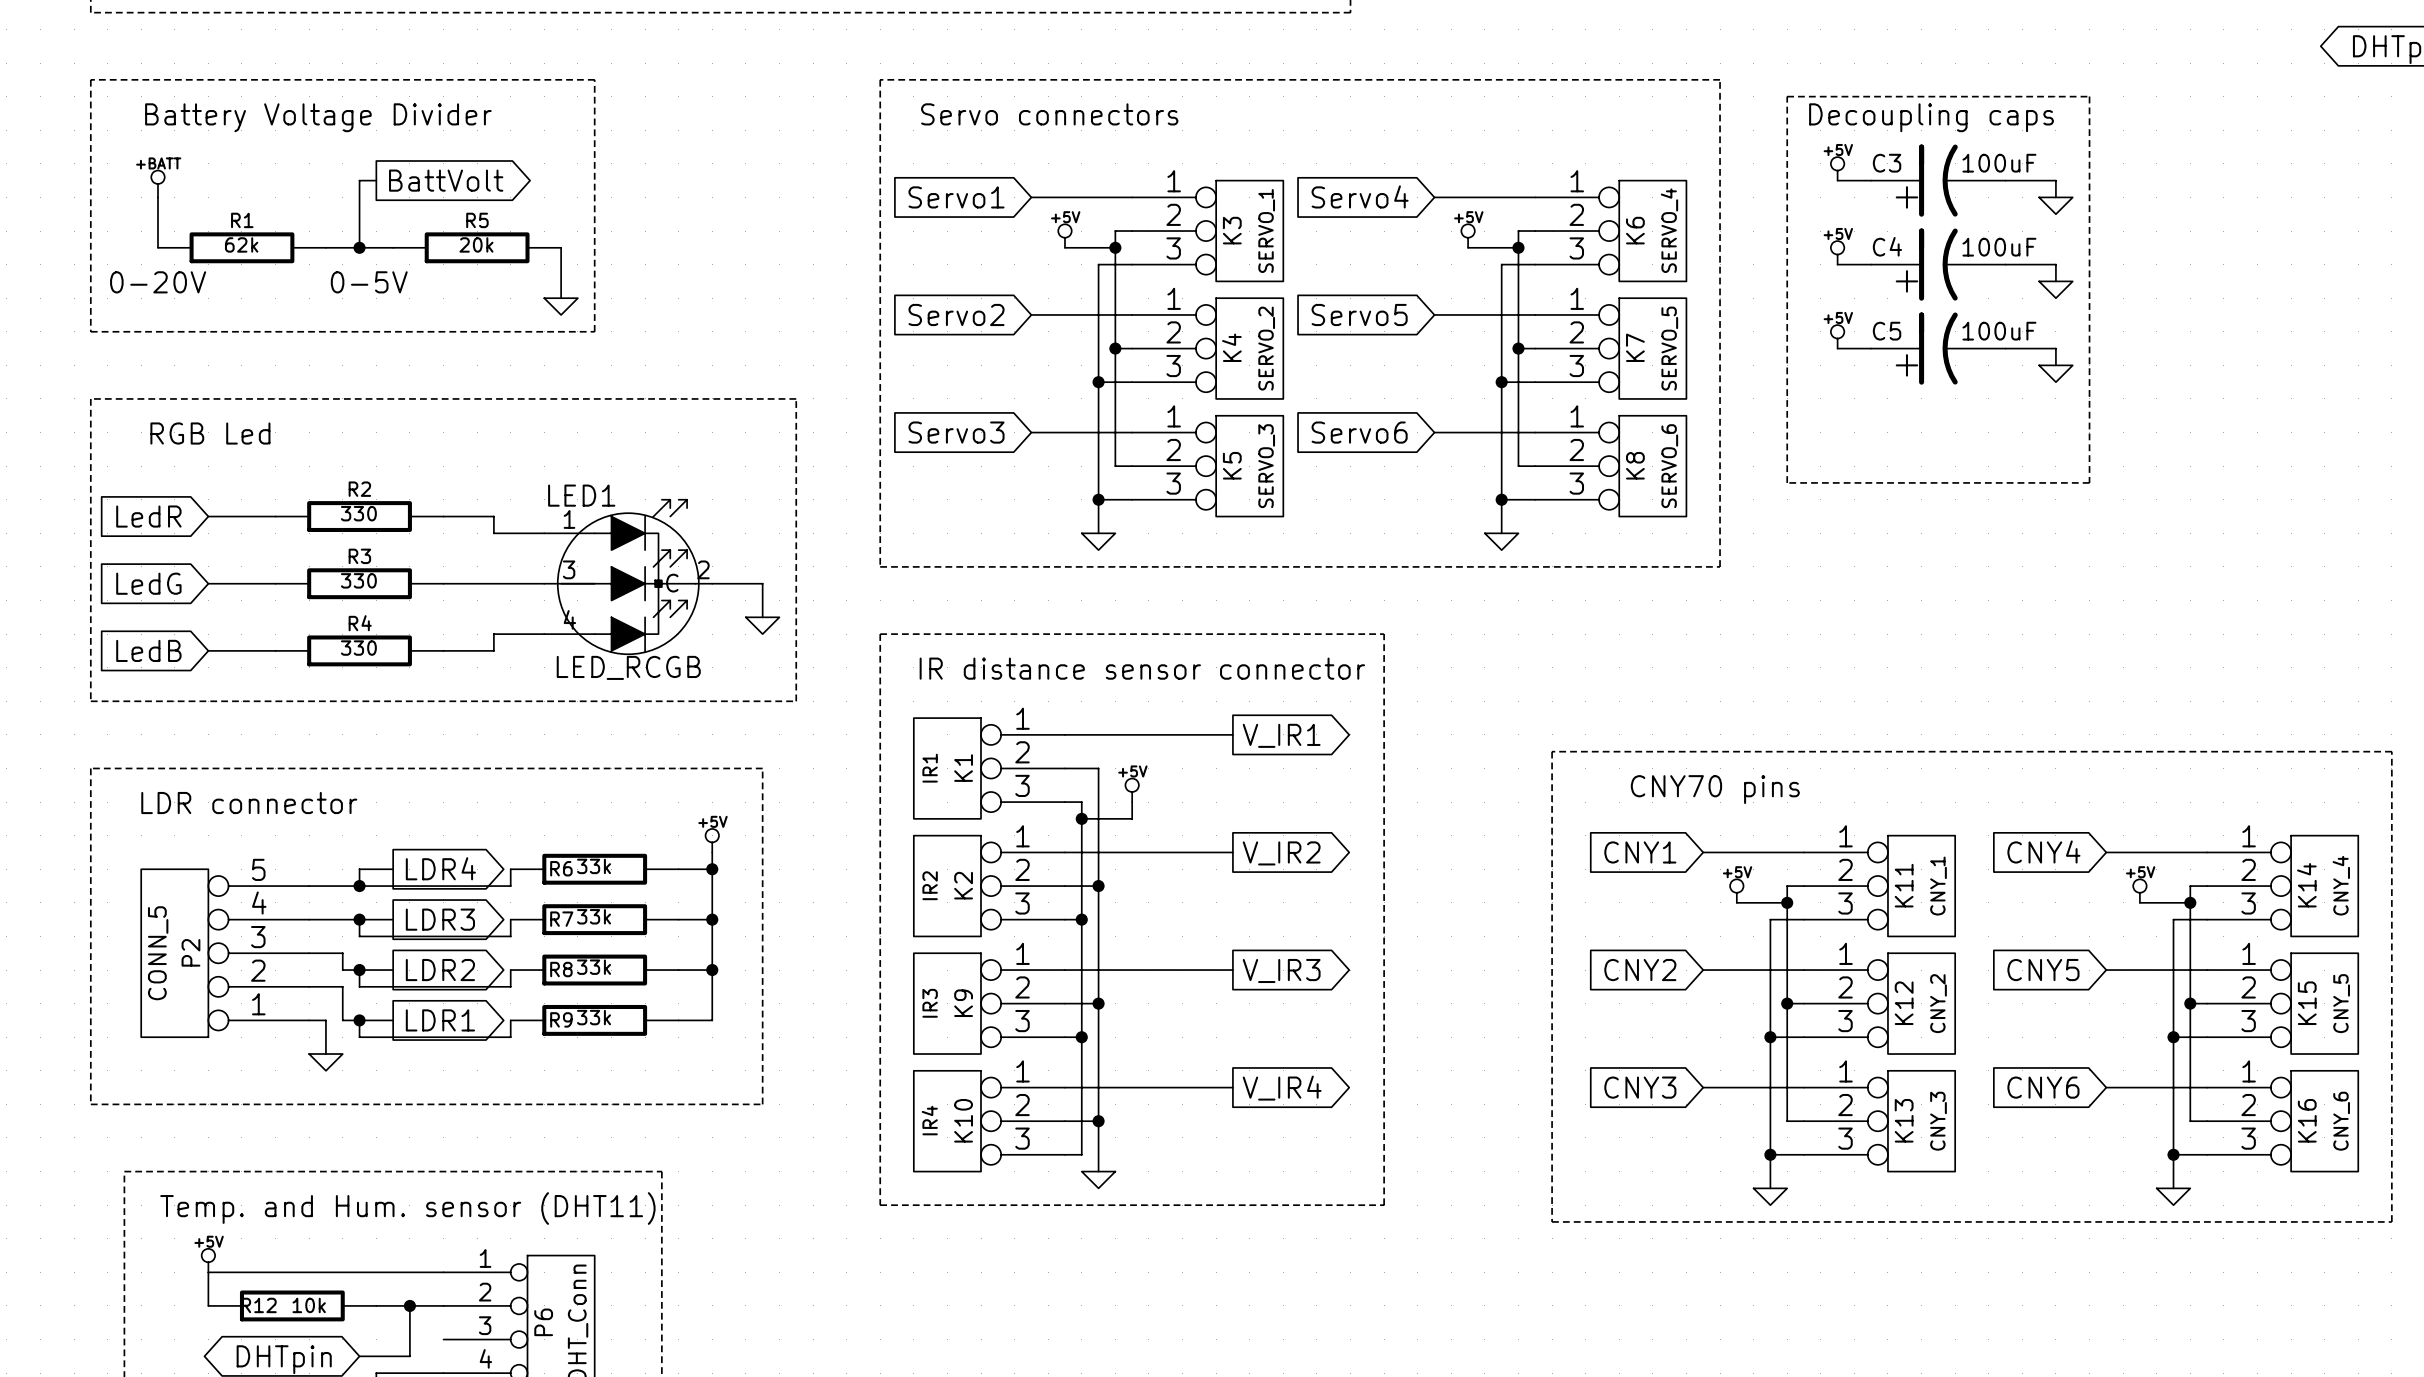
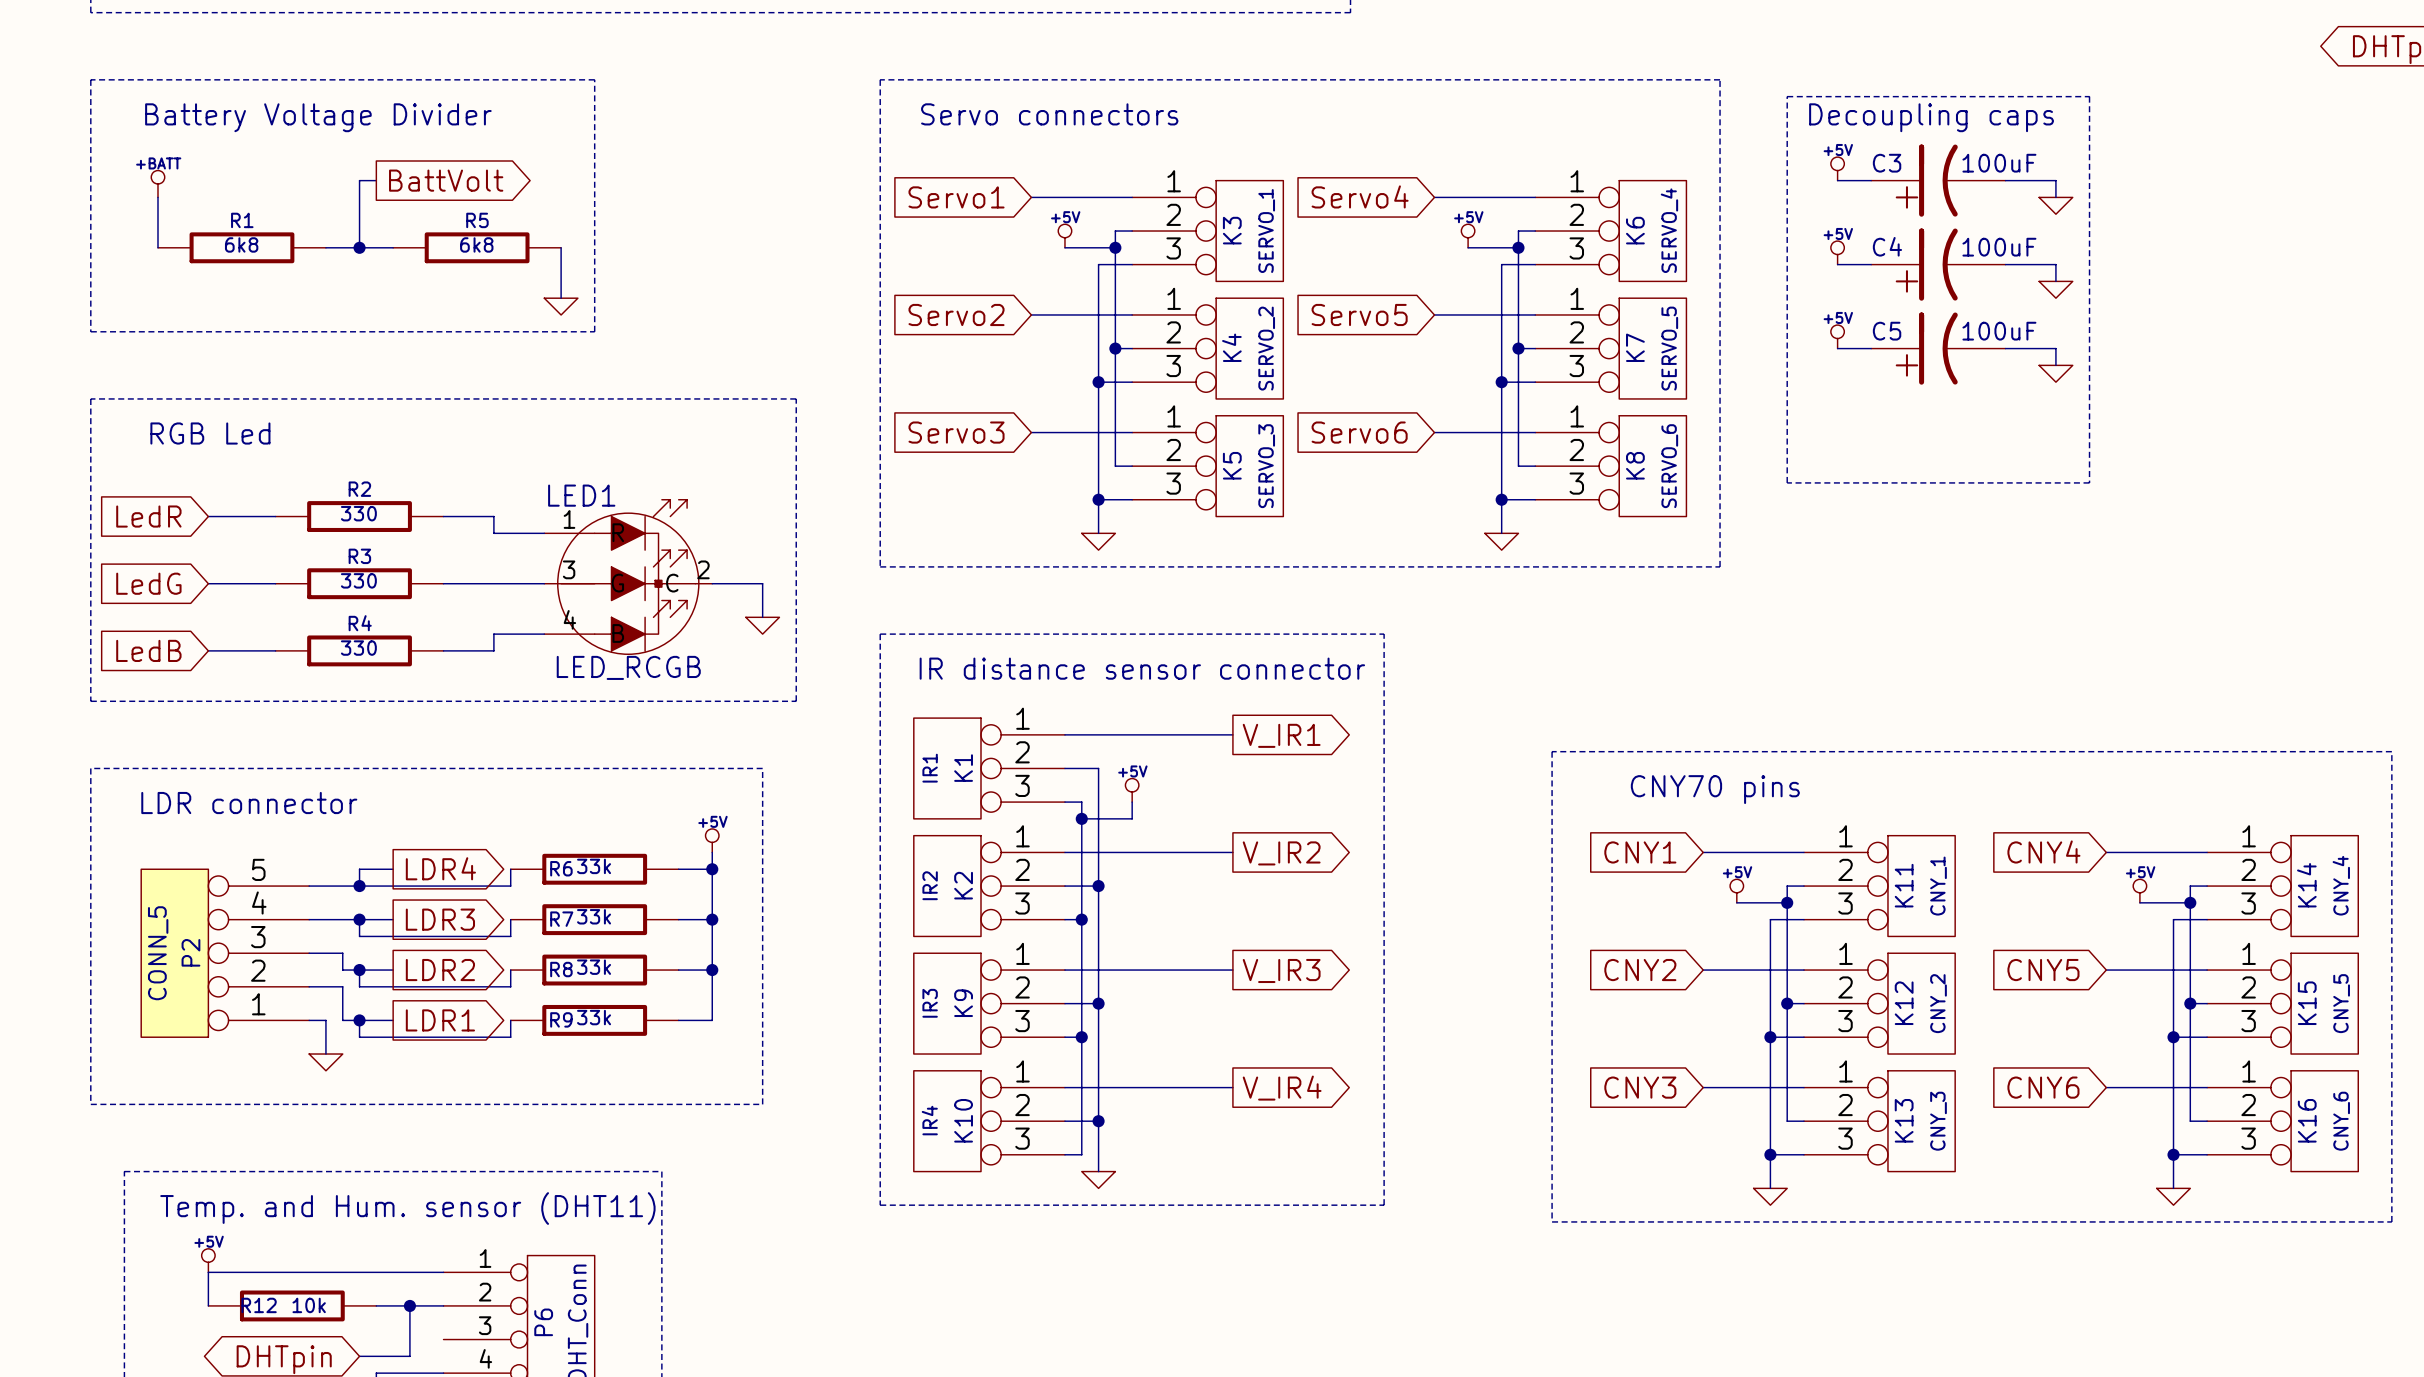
R1 value: 62k (241, 244) -> 6k8 (241, 244)
R5 value: 20k (476, 244) -> 6k8 (476, 244)
text: 0-20V (158, 282) -> none
text: 0-5V (369, 282) -> none

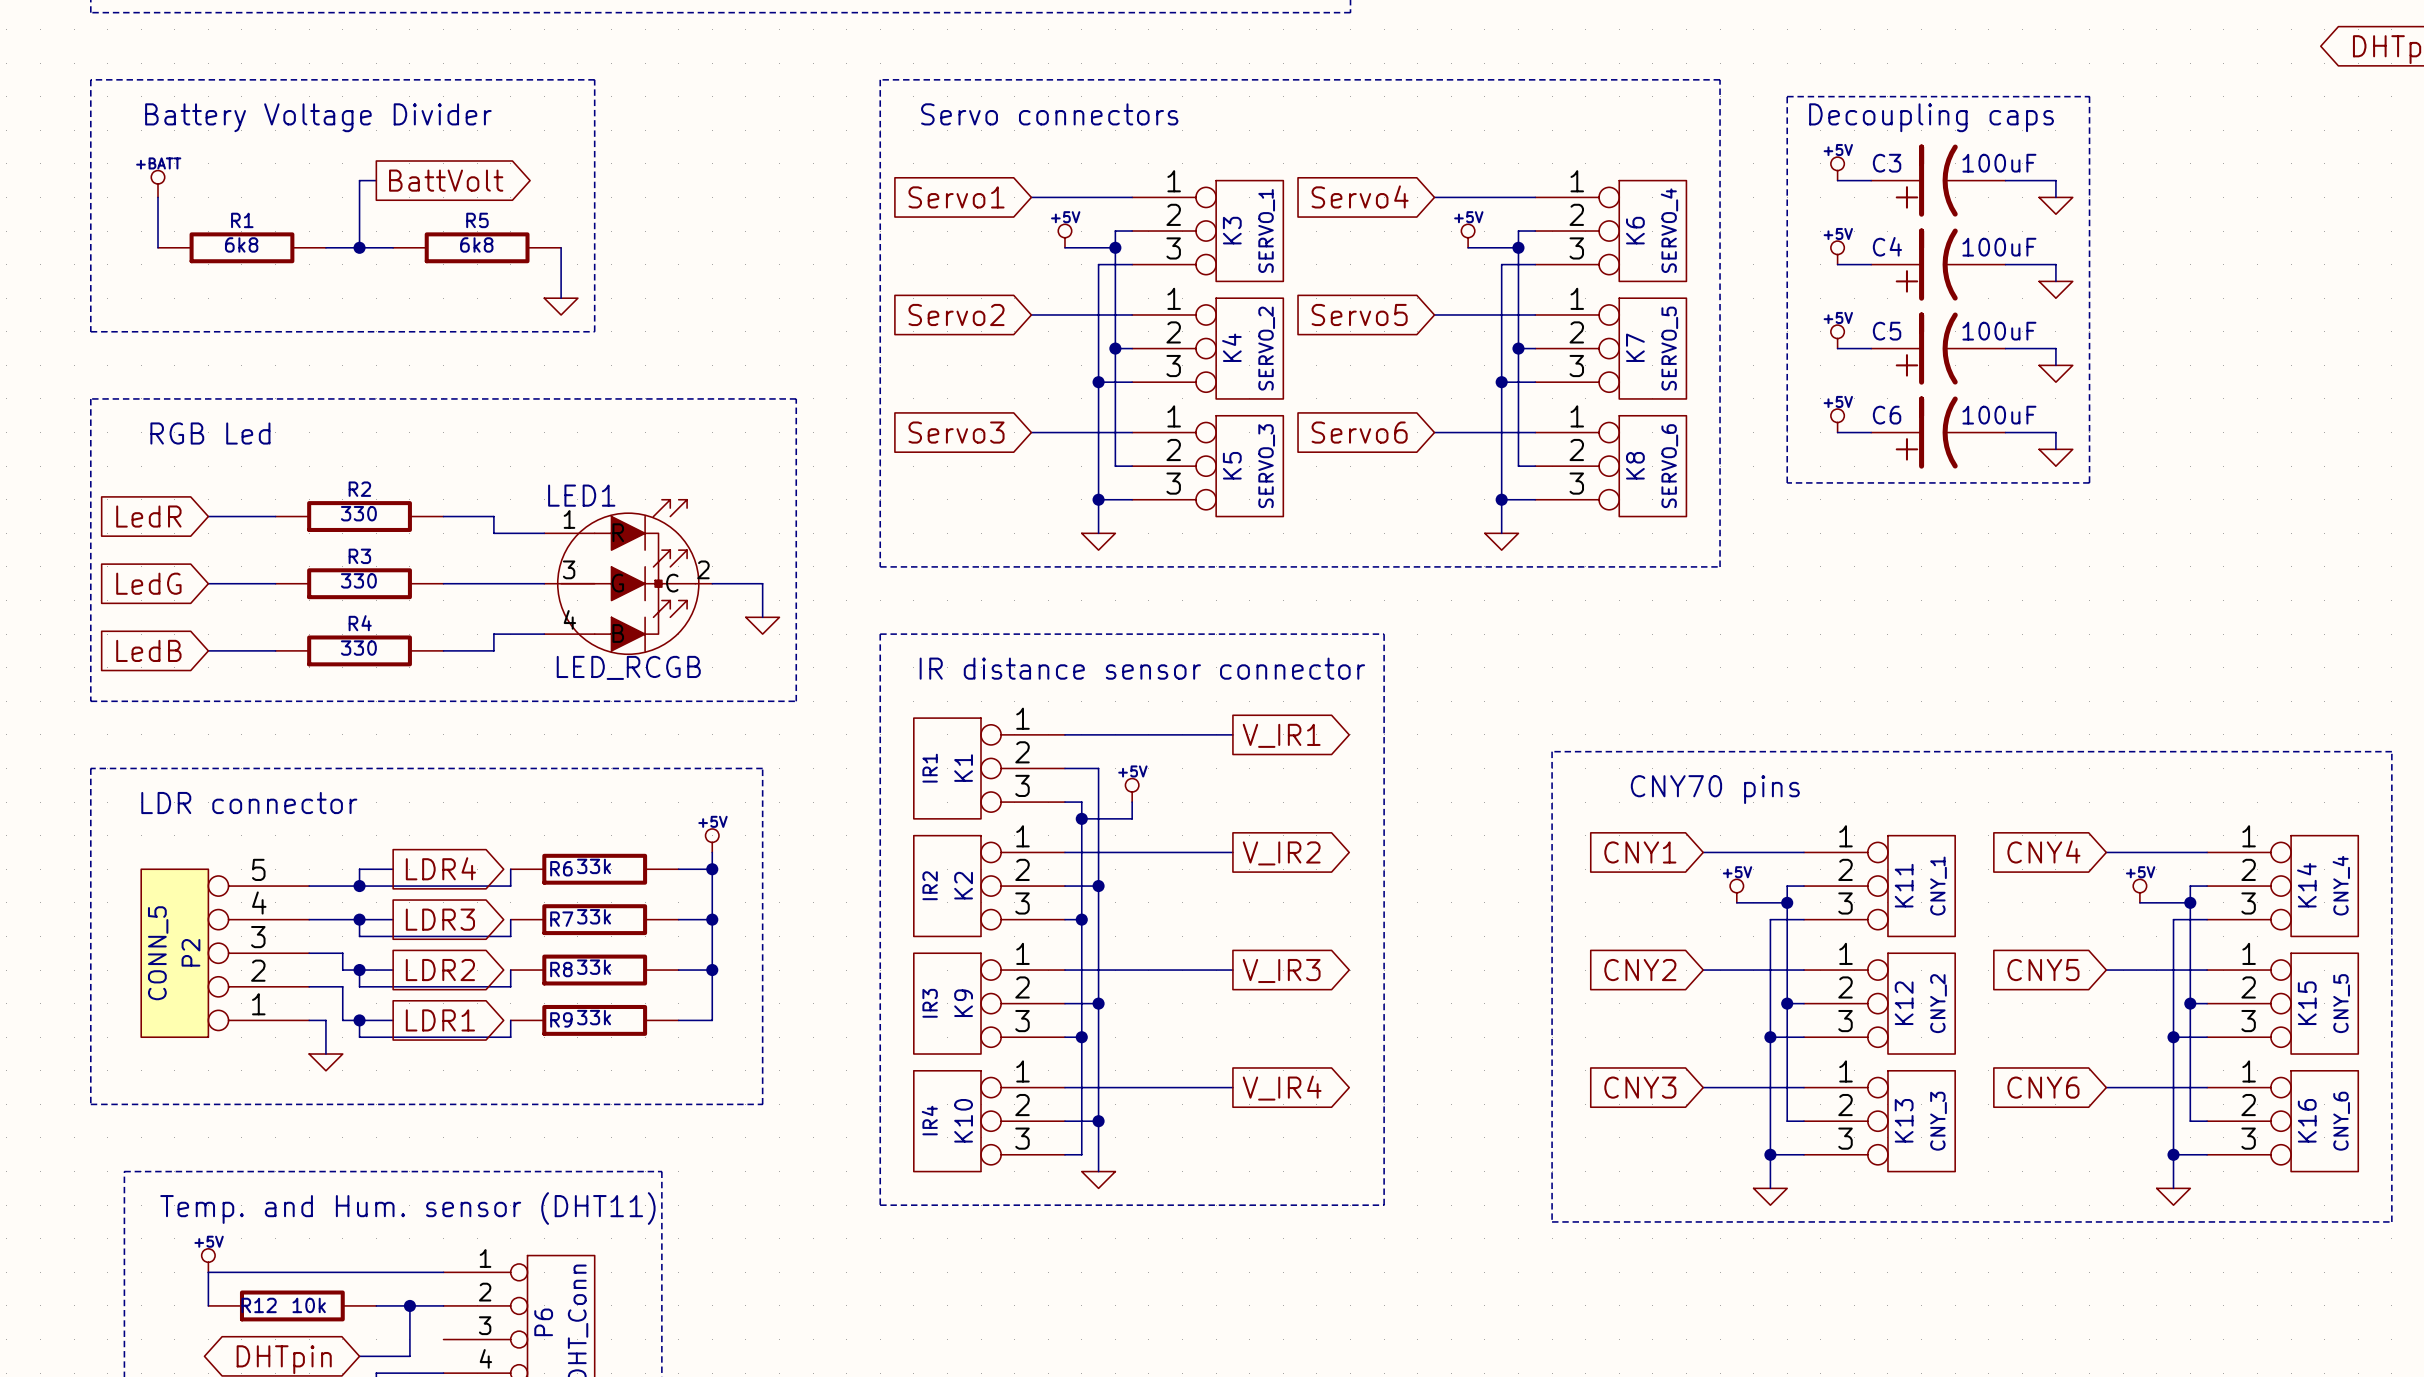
power symbol: none -> +5V (1837, 420)
wire: none -> (1837, 432) (1871, 432)
C6: none -> 100uF (1938, 432)
wire: none -> (2005, 432) (2055, 432) (2055, 449)
power symbol: none -> (2055, 457)

